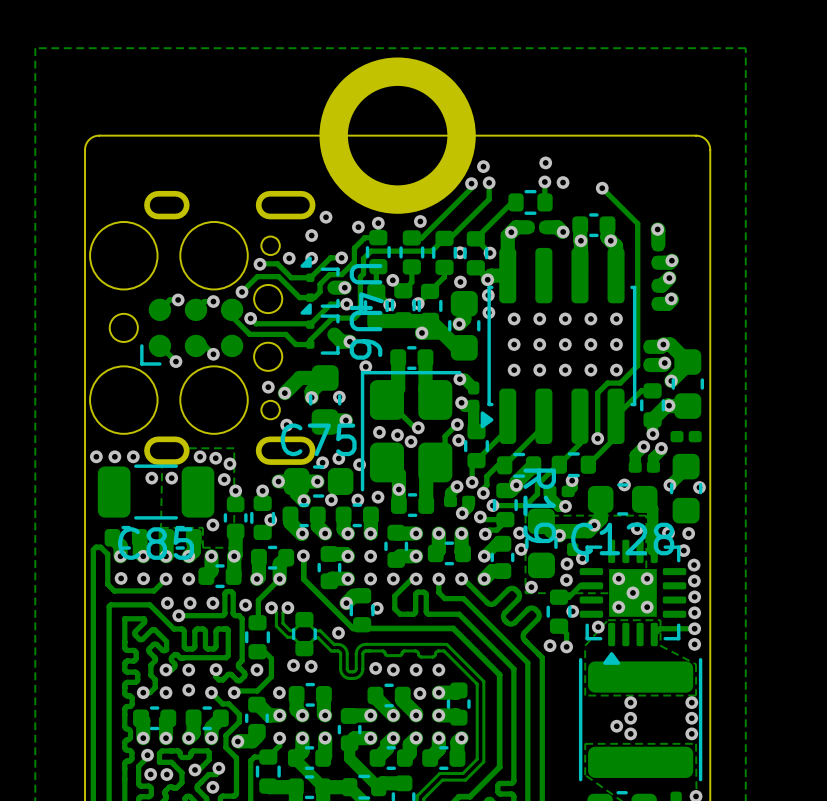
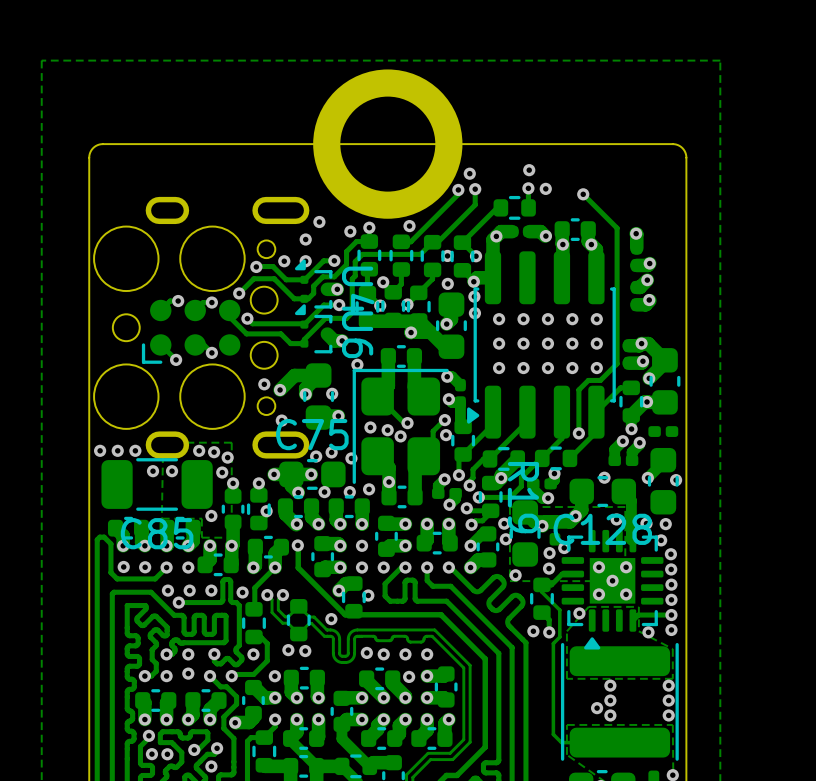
track: none -> (541, 584) (541, 592) (559, 610) (559, 637) (553, 643) (553, 734) (561, 742) (619, 742)
via position: (572, 611) -> (648, 632)

